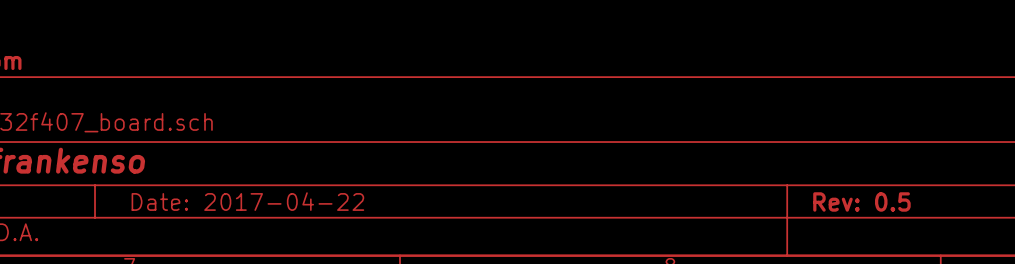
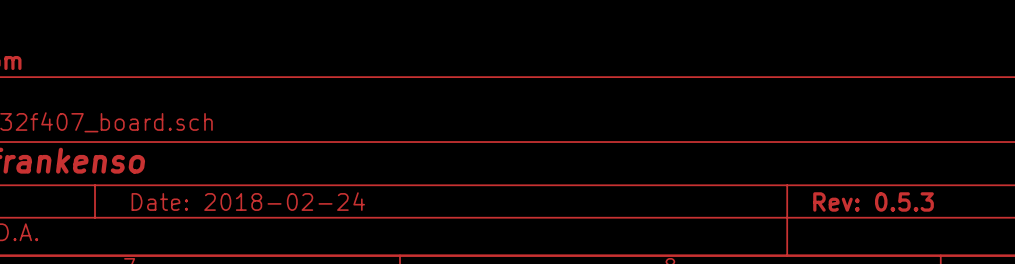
title block: Date: 2017-04-22 (247, 201) -> Date: 2018-02-24 (248, 201)
title block: Rev: 0.5 (861, 201) -> Rev: 0.5.3 (873, 201)

